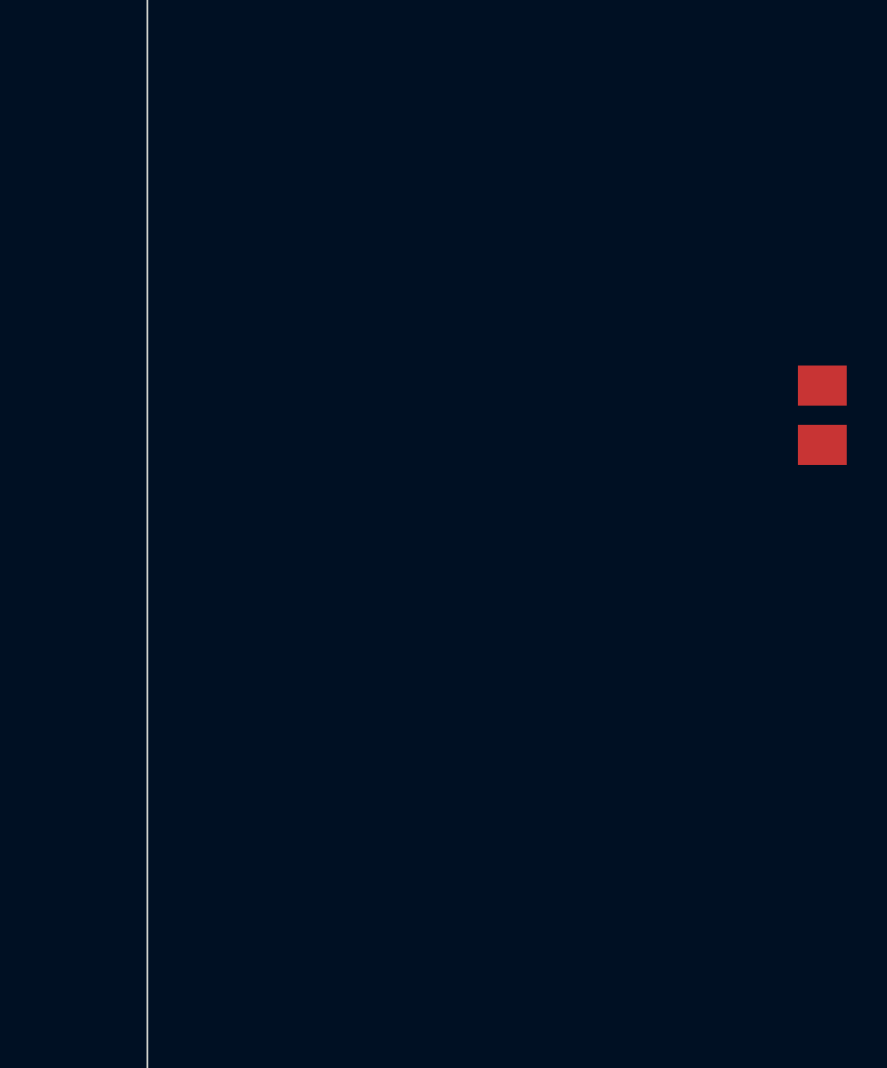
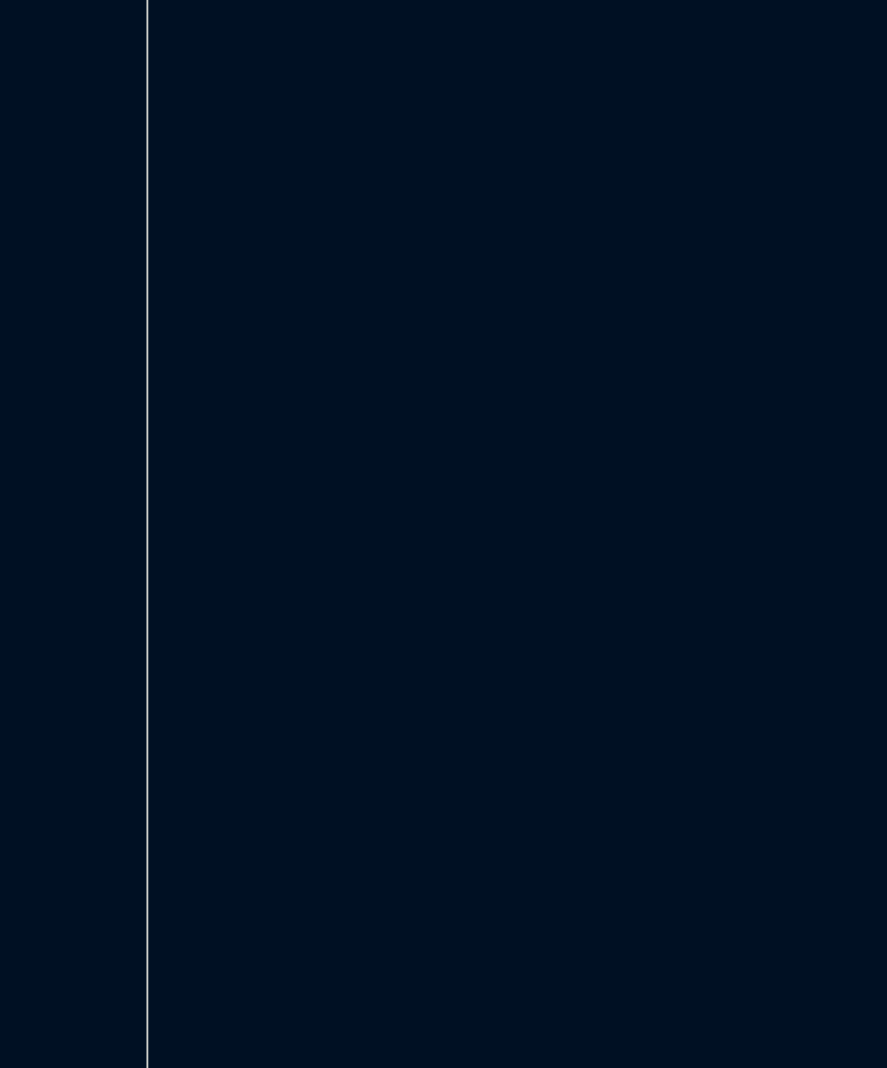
part: (822, 415) -> none

